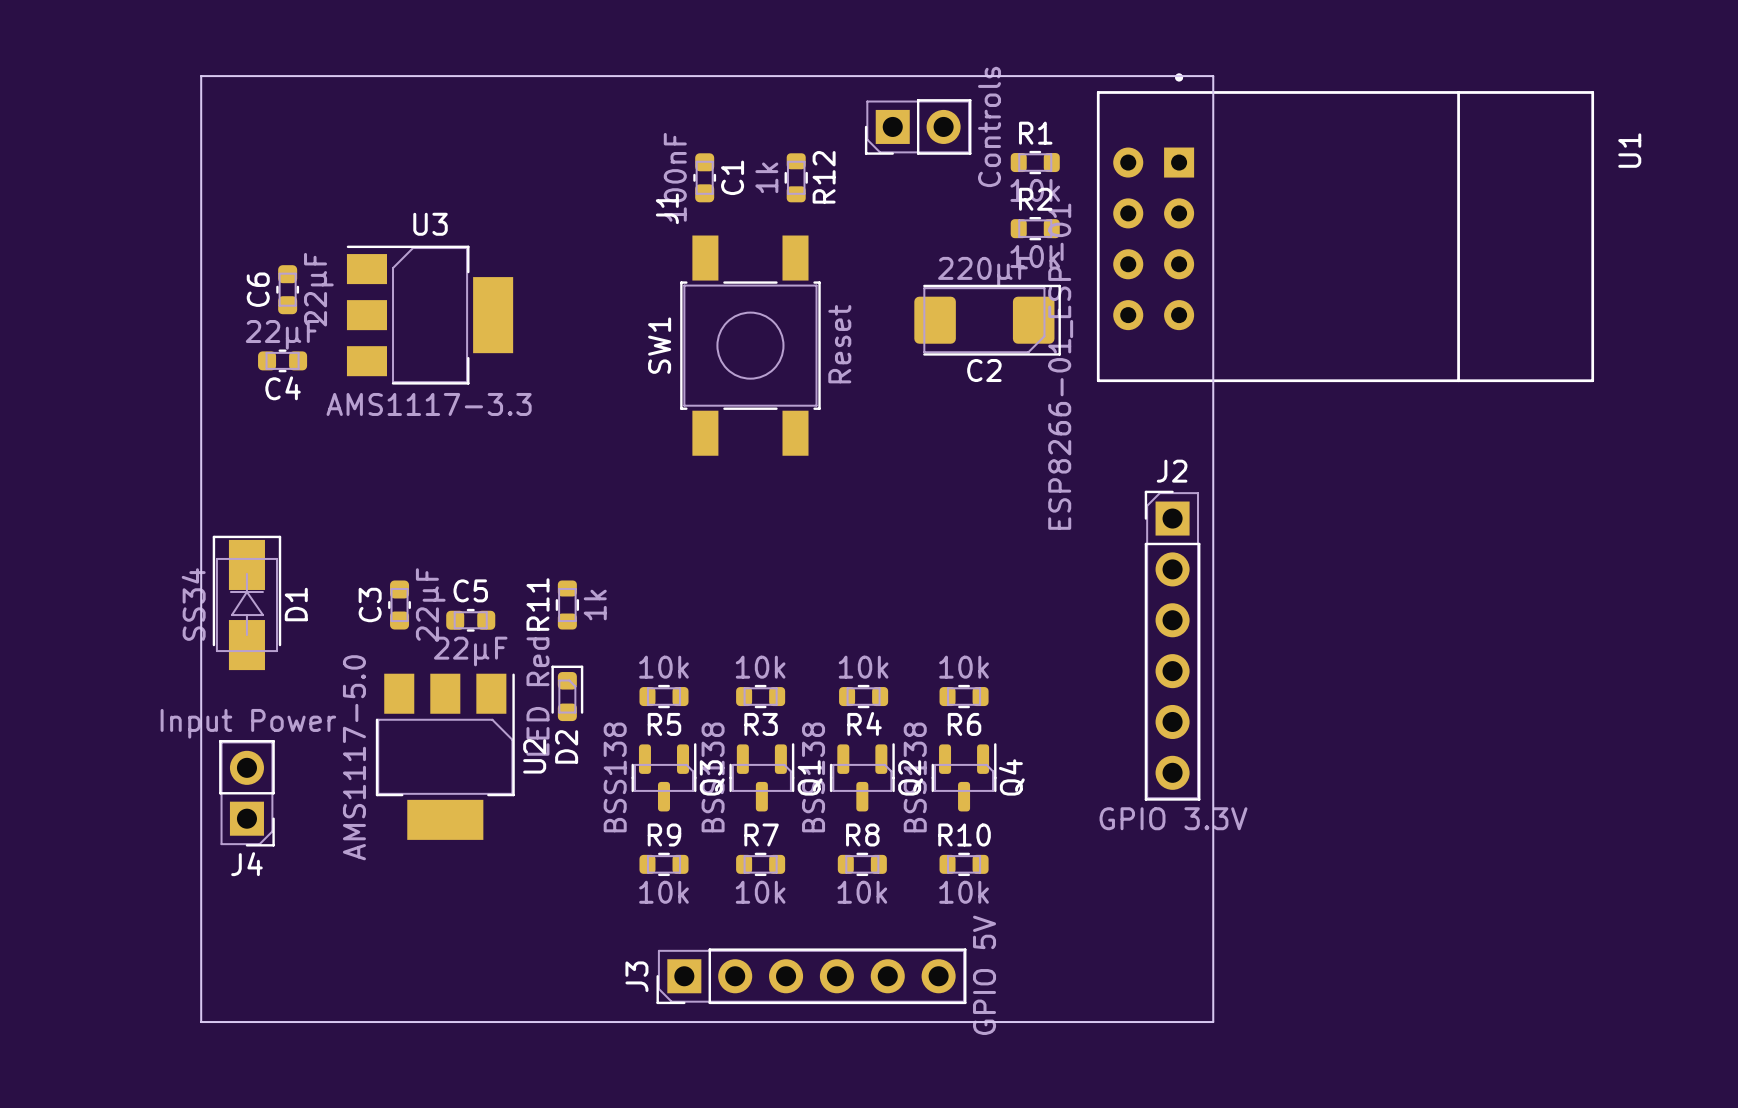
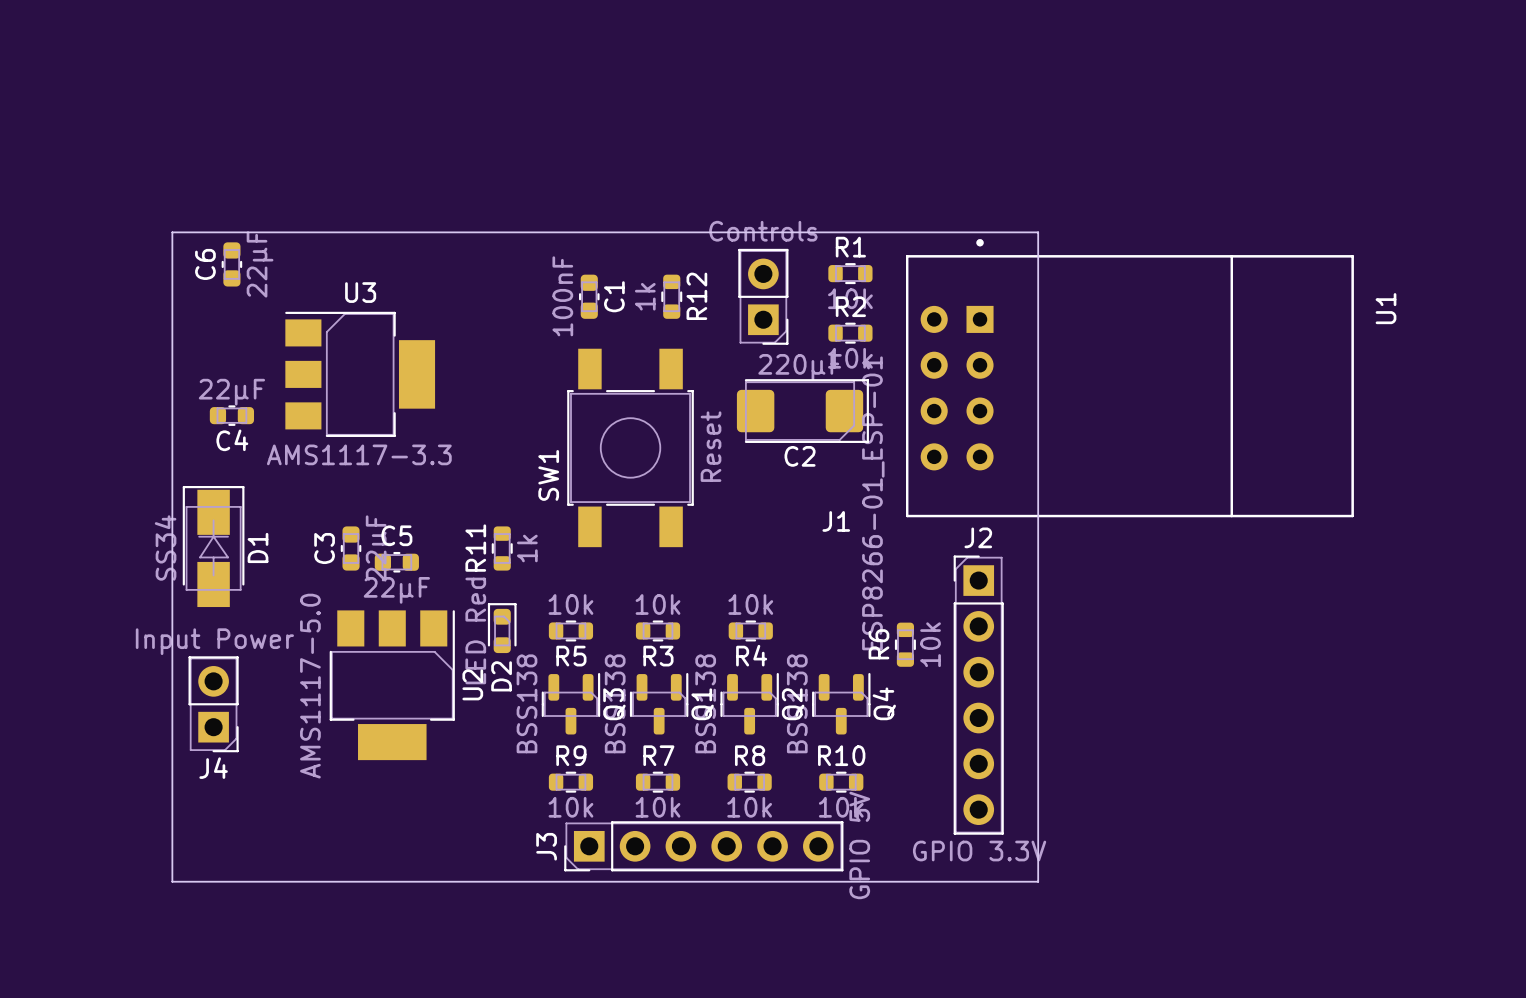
board edge: (201, 76) (1213, 76) (1213, 1022) (201, 1022) (201, 76) -> (172, 232) (172, 881) (1038, 881) (1038, 232) (172, 232)
J1 rotation: 0° (918, 126) -> 90° counterclockwise (763, 296)
J1 position: (918, 126) -> (763, 296)
R1 position: (1035, 162) -> (850, 273)
C1 position: (704, 177) -> (589, 296)
R12 position: (796, 177) -> (671, 296)
U1 position: (1345, 227) -> (1129, 378)
R2 position: (1035, 228) -> (850, 333)
U3 position: (429, 315) -> (360, 374)
C2 position: (987, 320) -> (802, 411)
SW1 name position: SW1 (659, 345) -> SW1 (548, 475)
SW1 position: (750, 345) -> (630, 447)
C4 position: (282, 360) -> (231, 415)
D1 position: (246, 602) -> (213, 546)
C3 position: (399, 605) -> (351, 548)
R11 position: (567, 605) -> (502, 548)
J2 position: (1172, 645) -> (978, 695)
D2 position: (567, 693) -> (502, 628)
R6 rotation: 0° (964, 696) -> 90° clockwise (905, 644)
R6 position: (964, 696) -> (905, 644)
U2 position: (445, 756) -> (392, 685)
J4 position: (246, 793) -> (213, 704)
J3 position: (811, 976) -> (703, 846)

